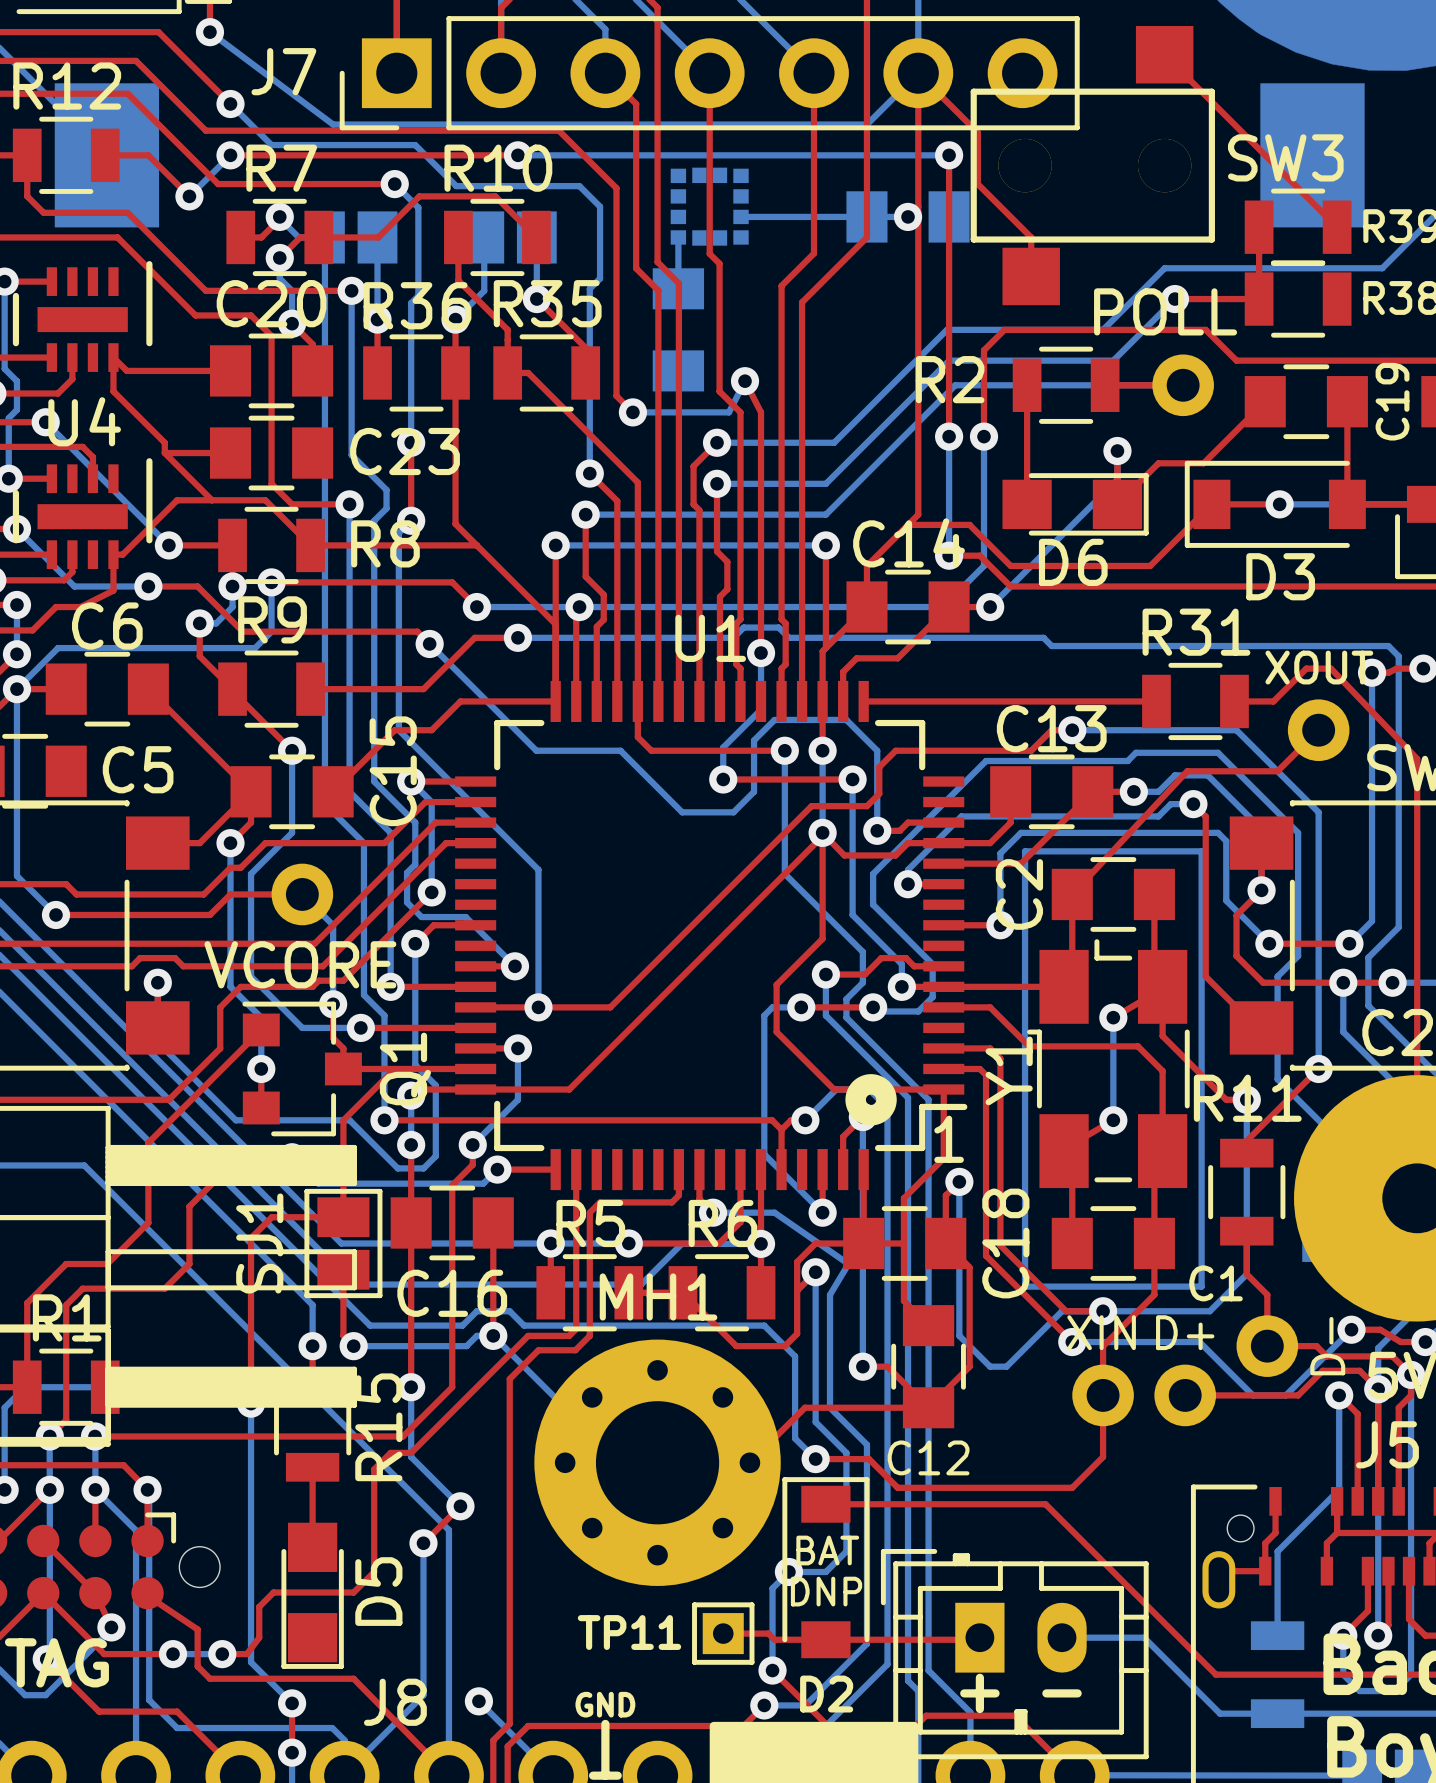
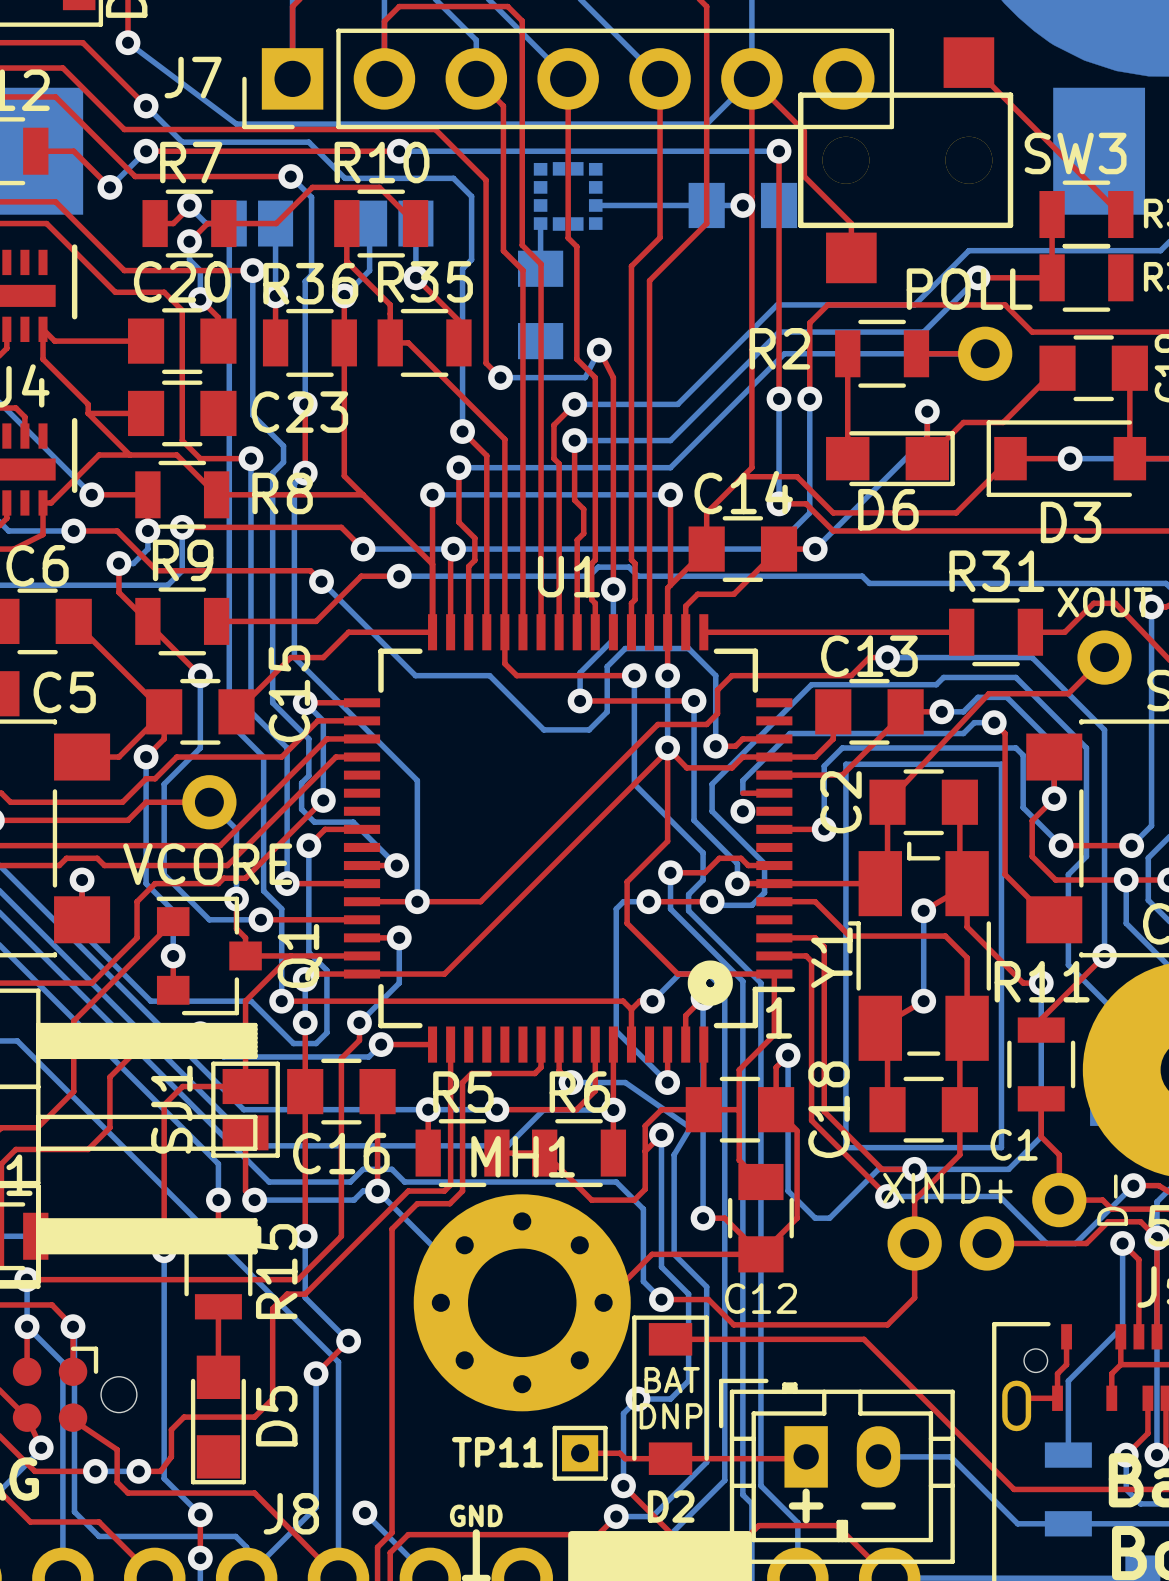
via position: (908, 884) -> (742, 811)

